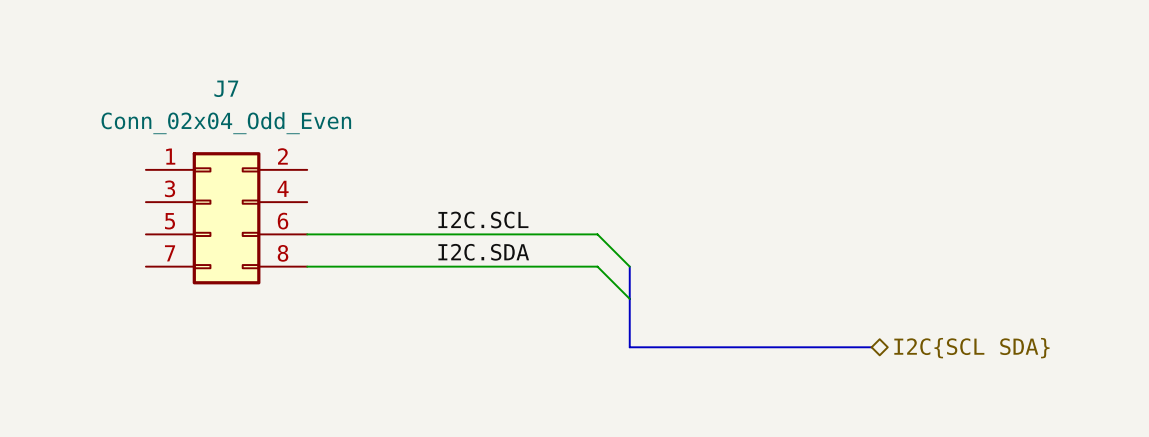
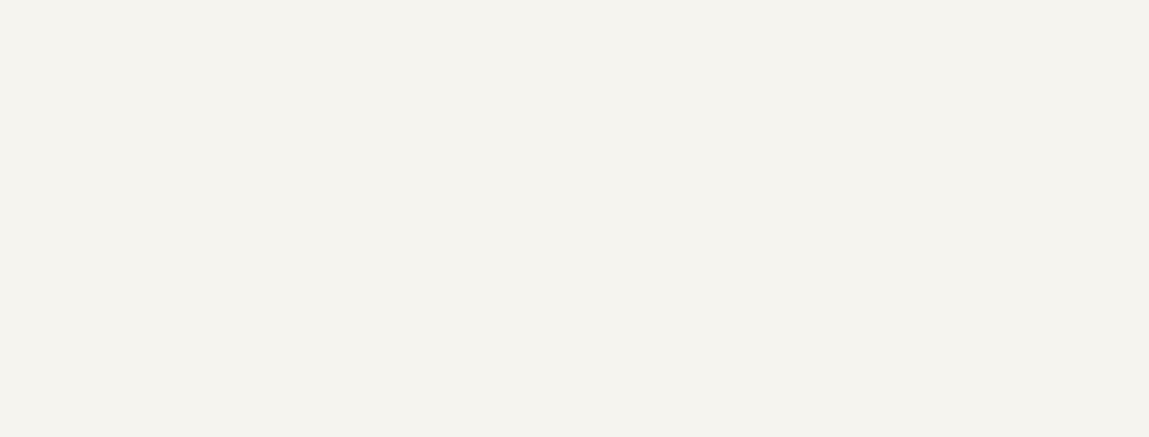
J7: Conn_02x04_Odd_Even (226, 218) -> none
label: I2C.SCL (483, 220) -> none
wire: (307, 234) (597, 234) (629, 266) -> none
label: I2C.SDA (483, 252) -> none
wire: (307, 266) (597, 266) (629, 298) -> none
bus: (629, 266) (629, 347) (871, 347) -> none
hierarchical label: I2C{SCL SDA} (971, 348) -> none

